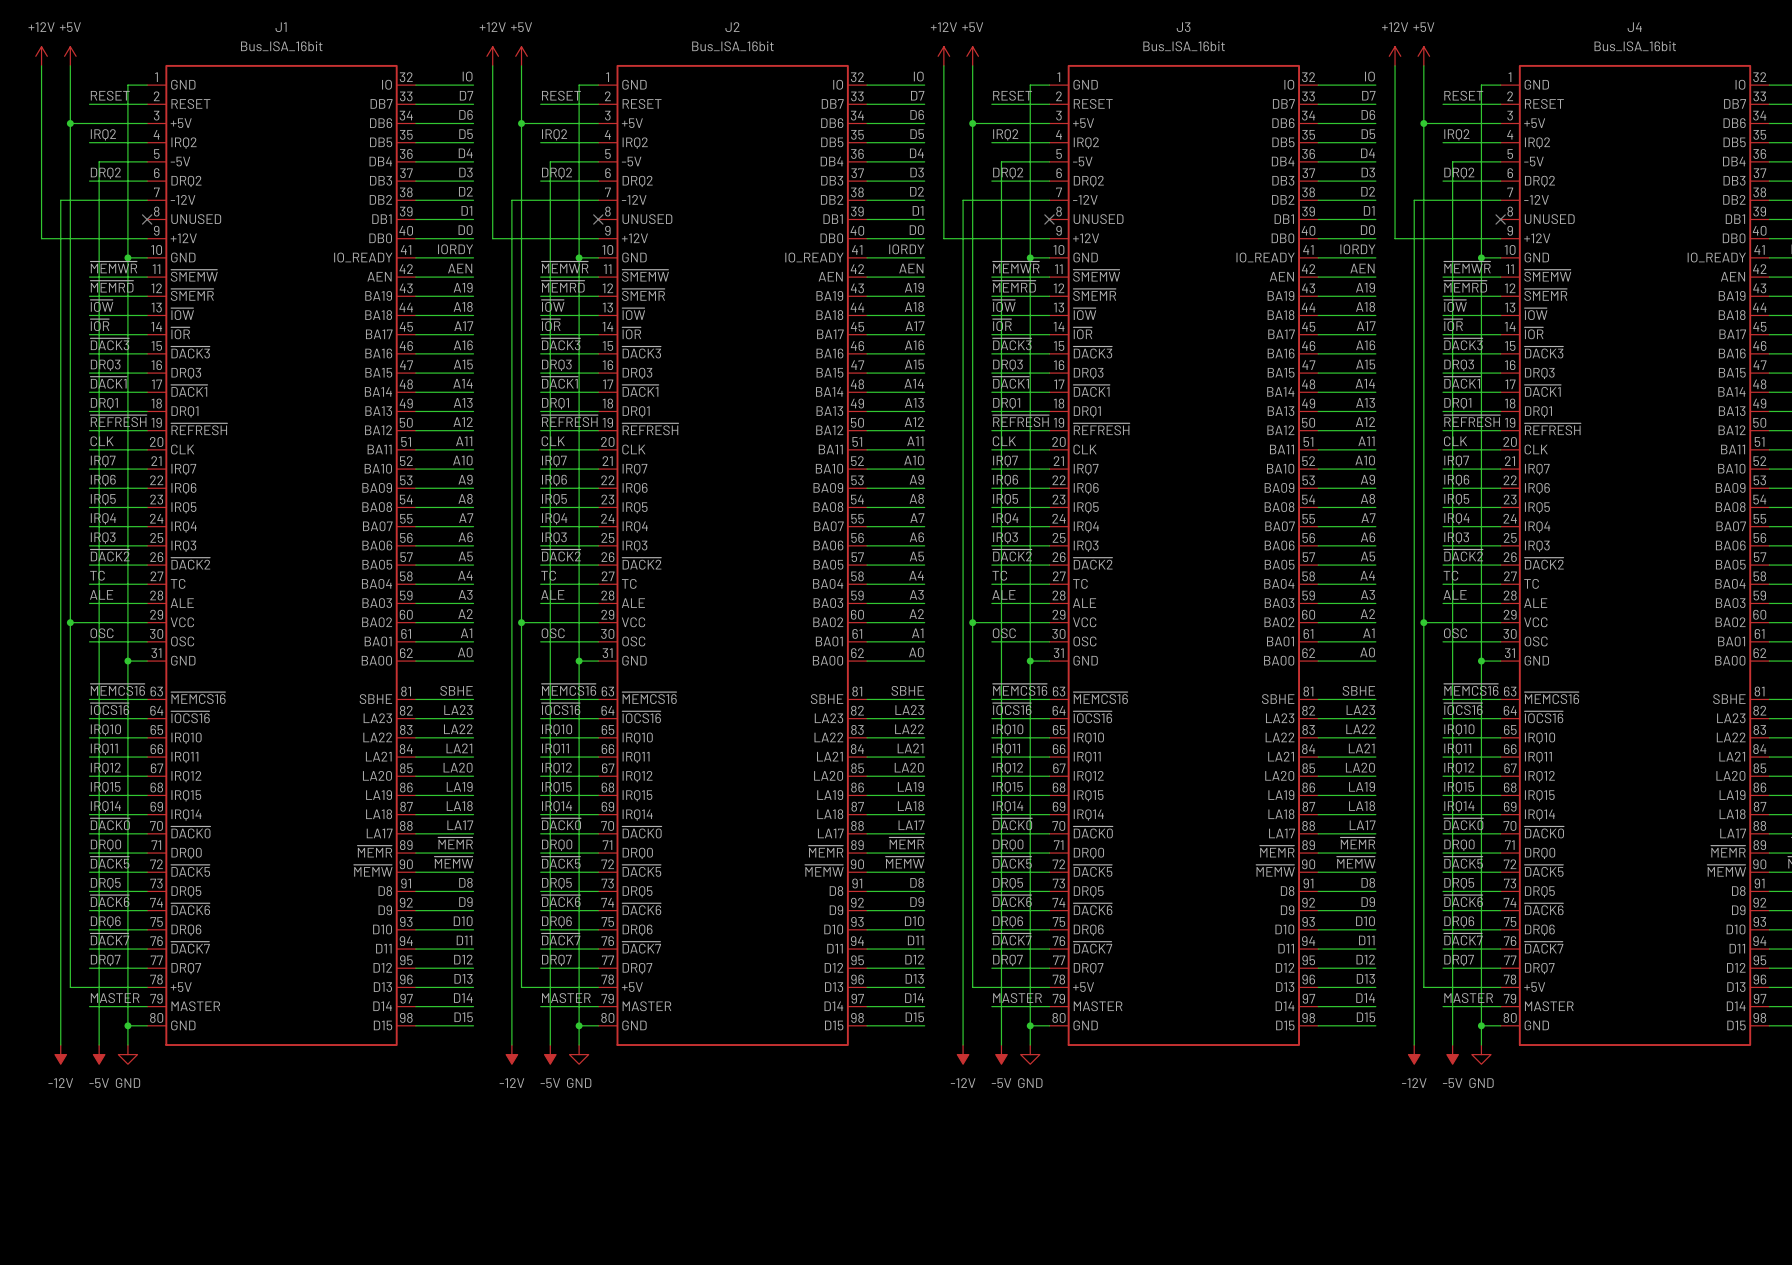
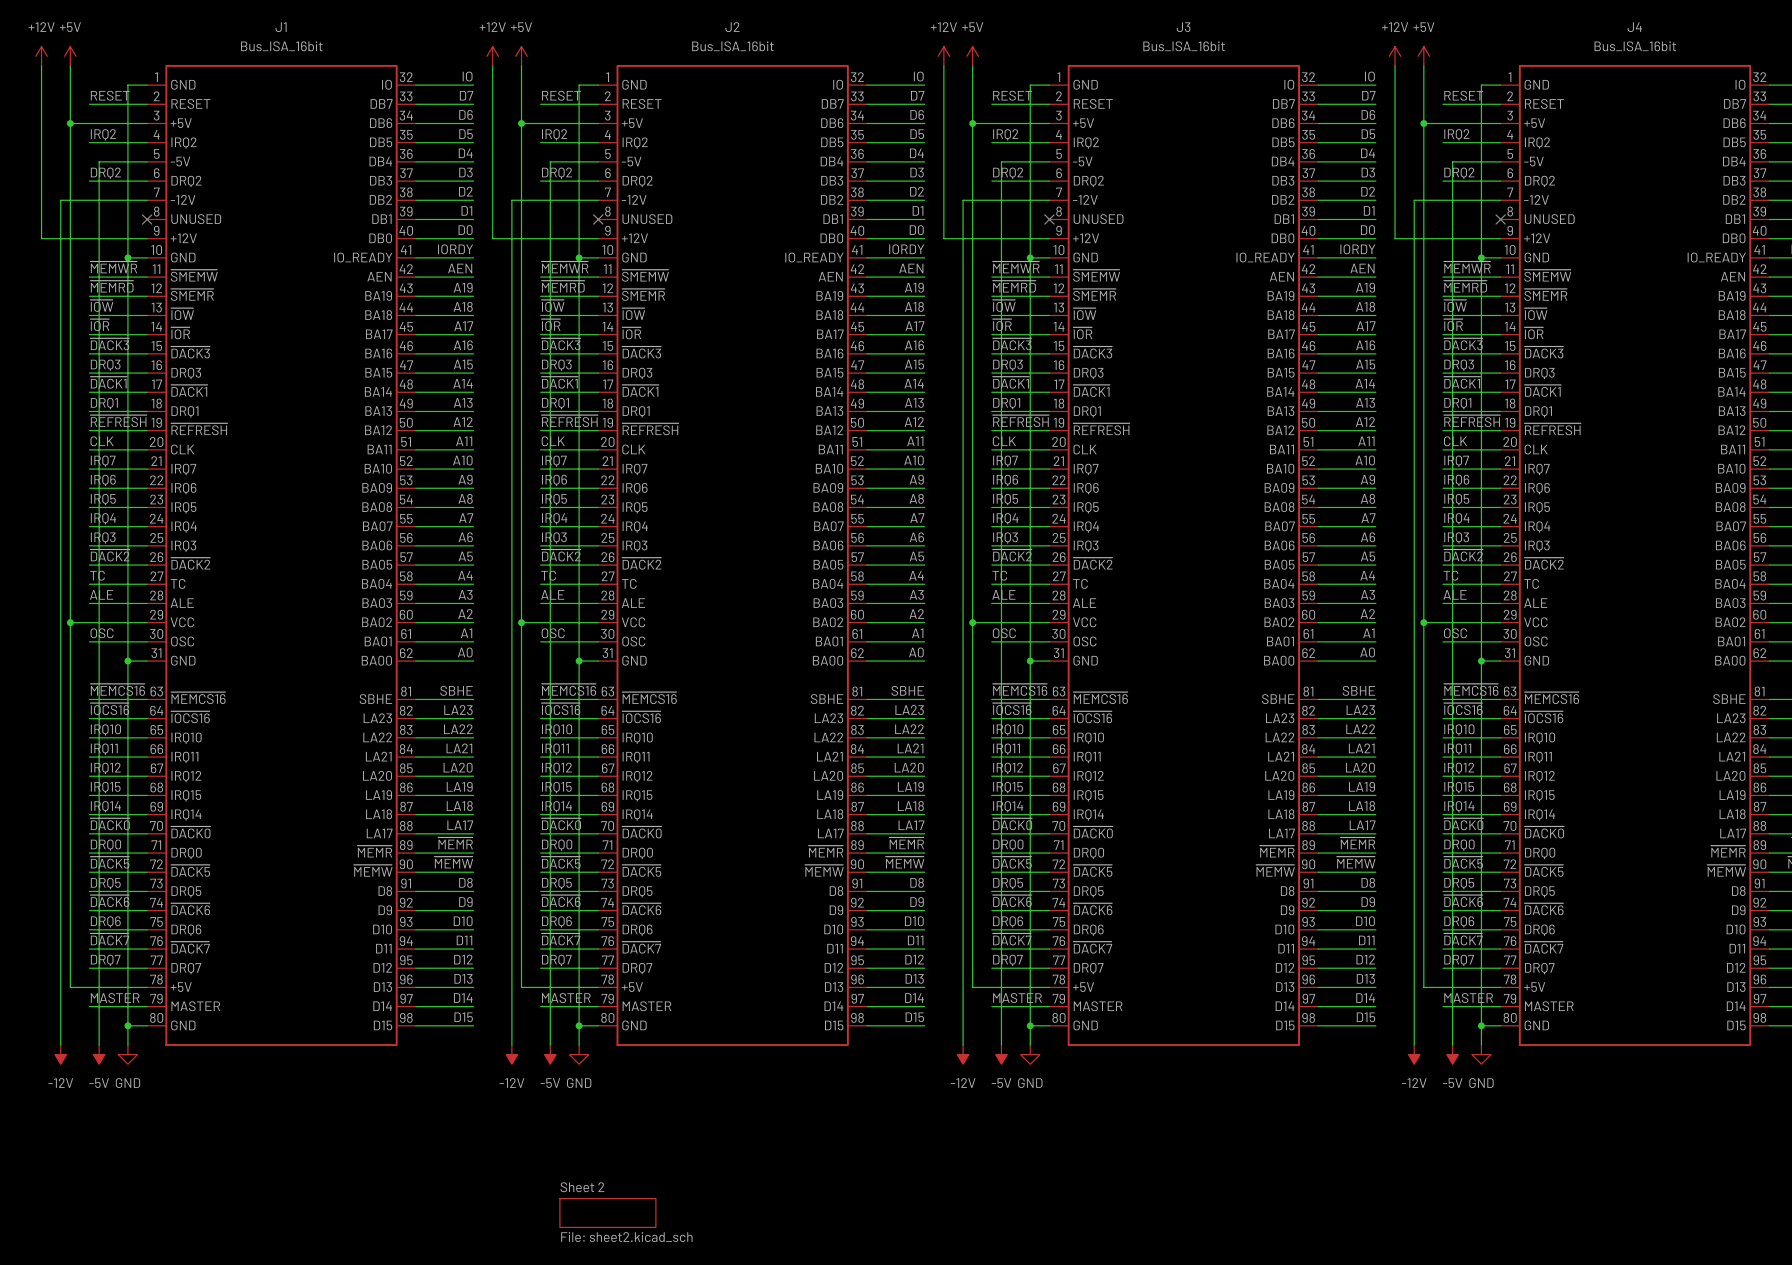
sheet Sheet 2: none -> File: sheet2.kicad_sch (607, 1213)

